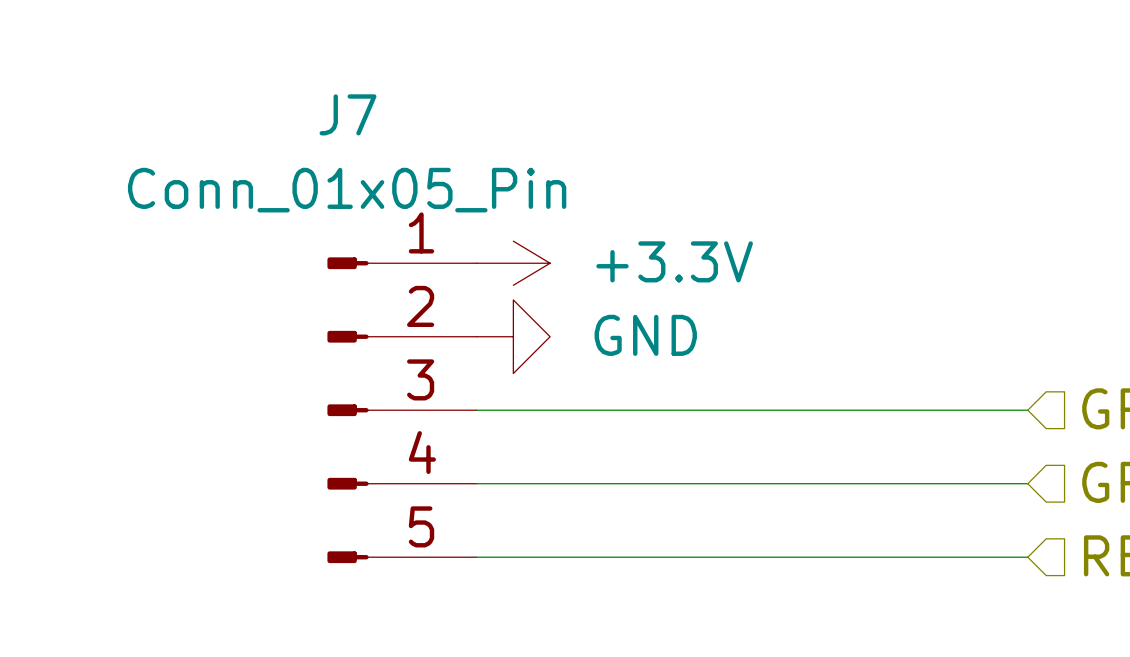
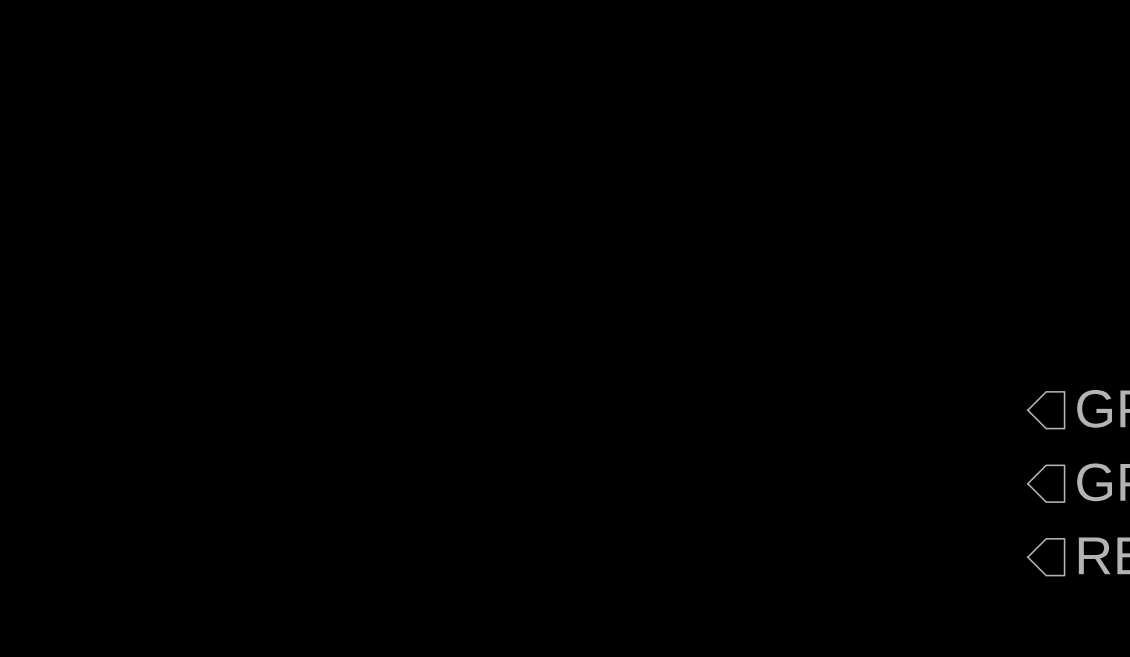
power symbol: +3.3V (513, 263) -> none
power symbol: GND (513, 336) -> none
J7: Conn_01x05_Pin (402, 410) -> none
wire: (476, 410) (1027, 410) -> none
wire: (476, 483) (1027, 483) -> none
wire: (476, 557) (1027, 557) -> none

